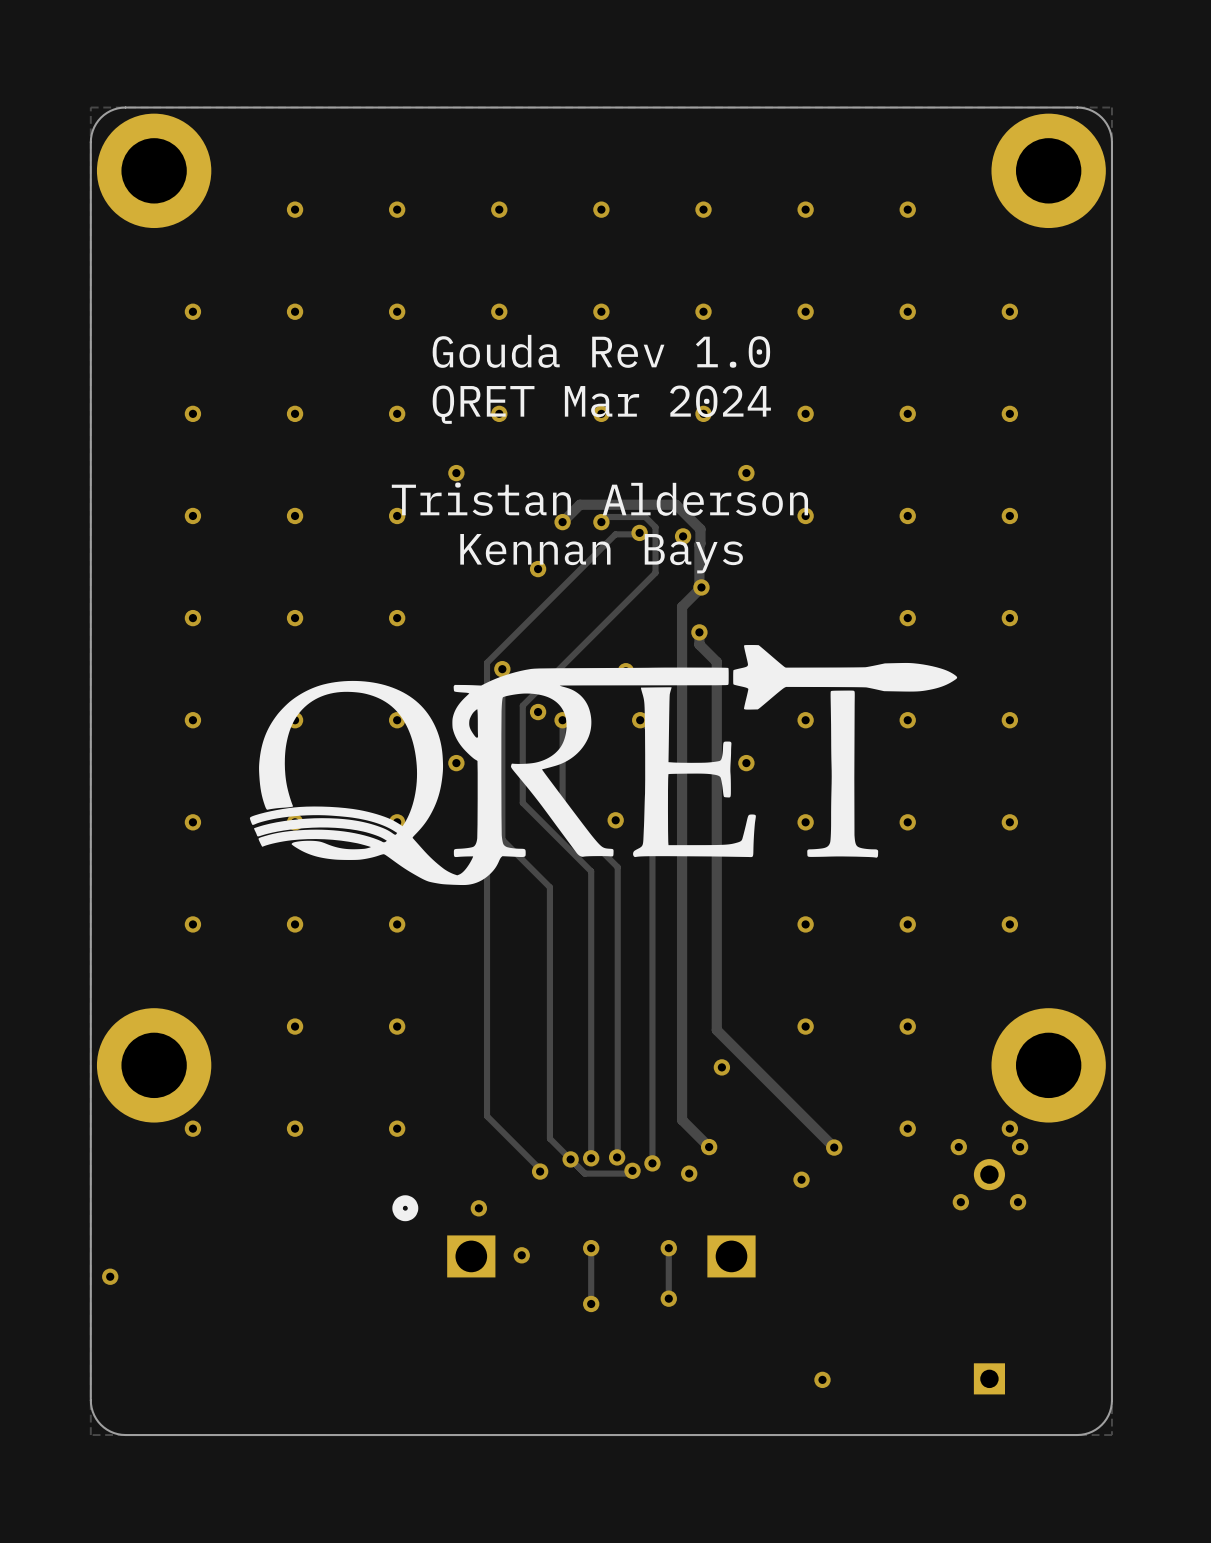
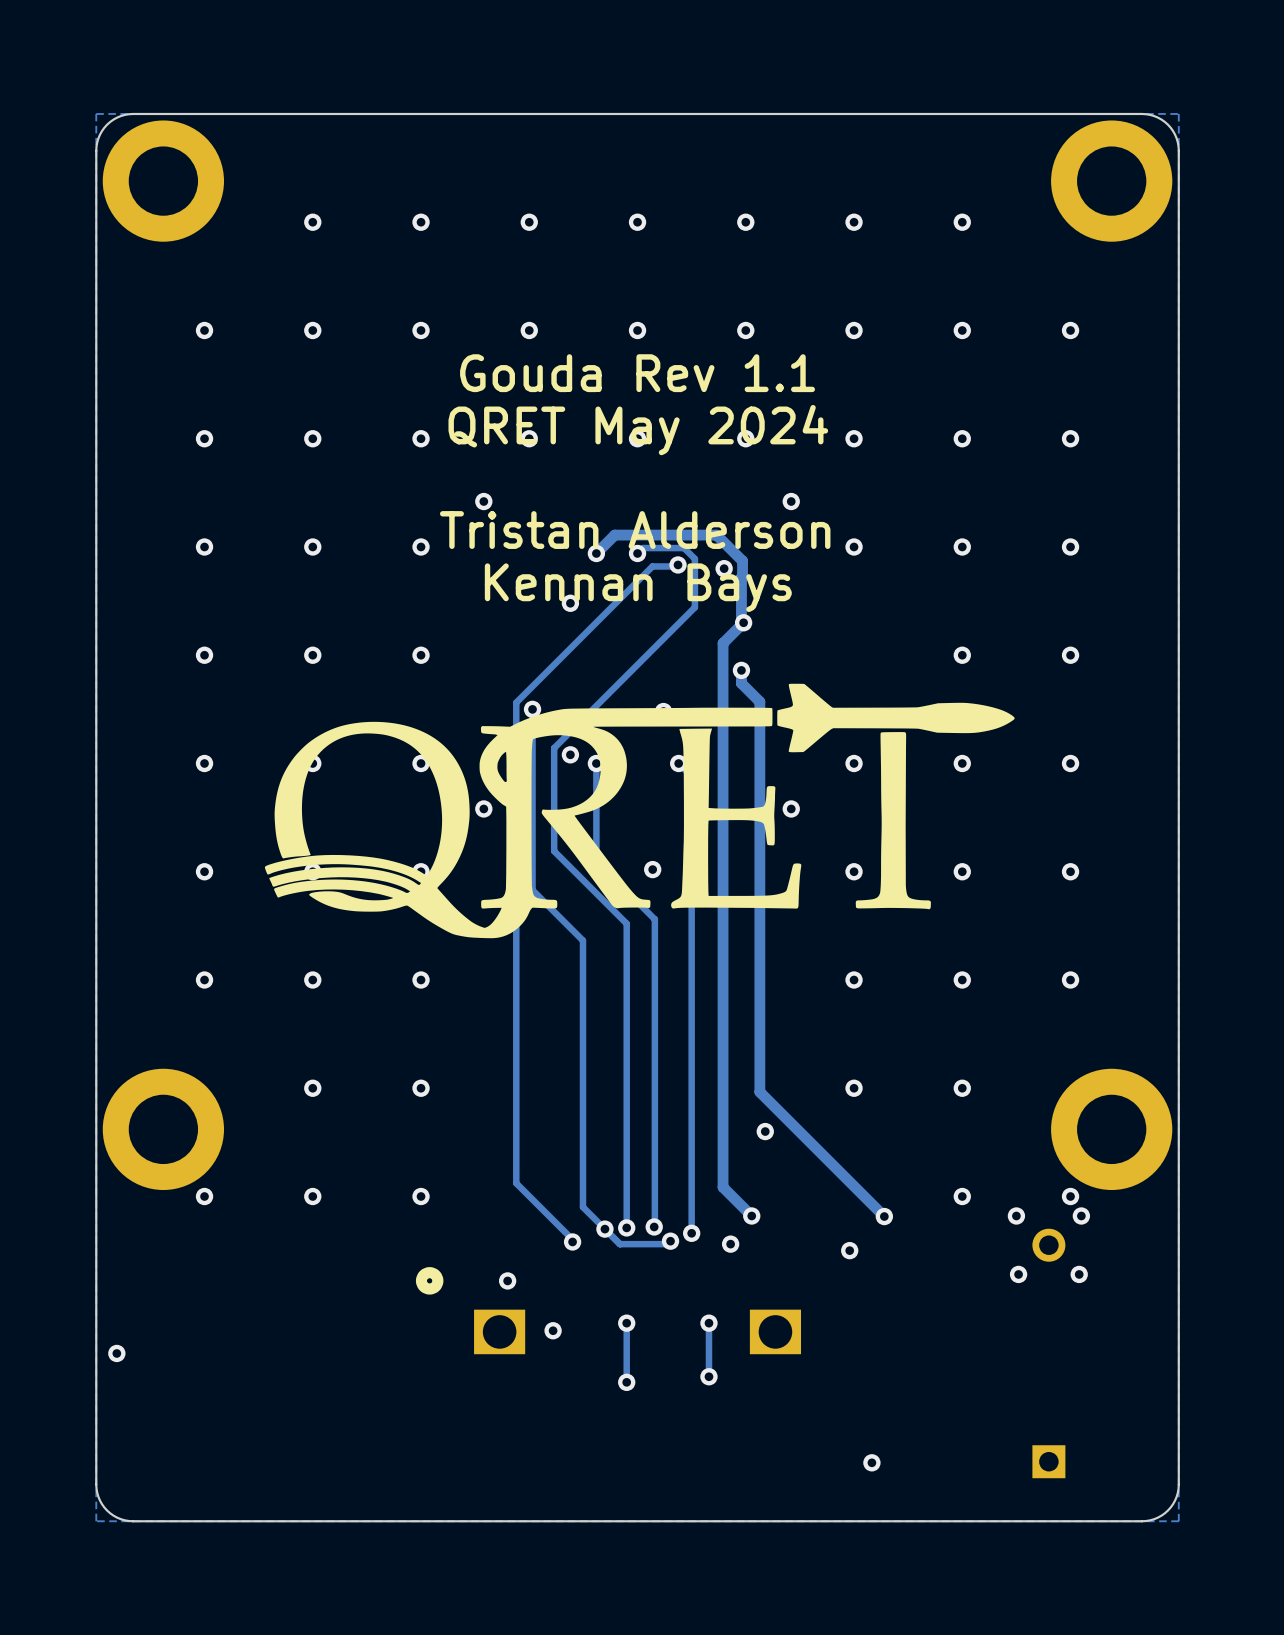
text: Gouda Rev 1.0 (601, 351) -> Gouda Rev 1.1 (637, 373)
text: QRET Mar 2024 (601, 404) -> QRET May 2024 (638, 430)

